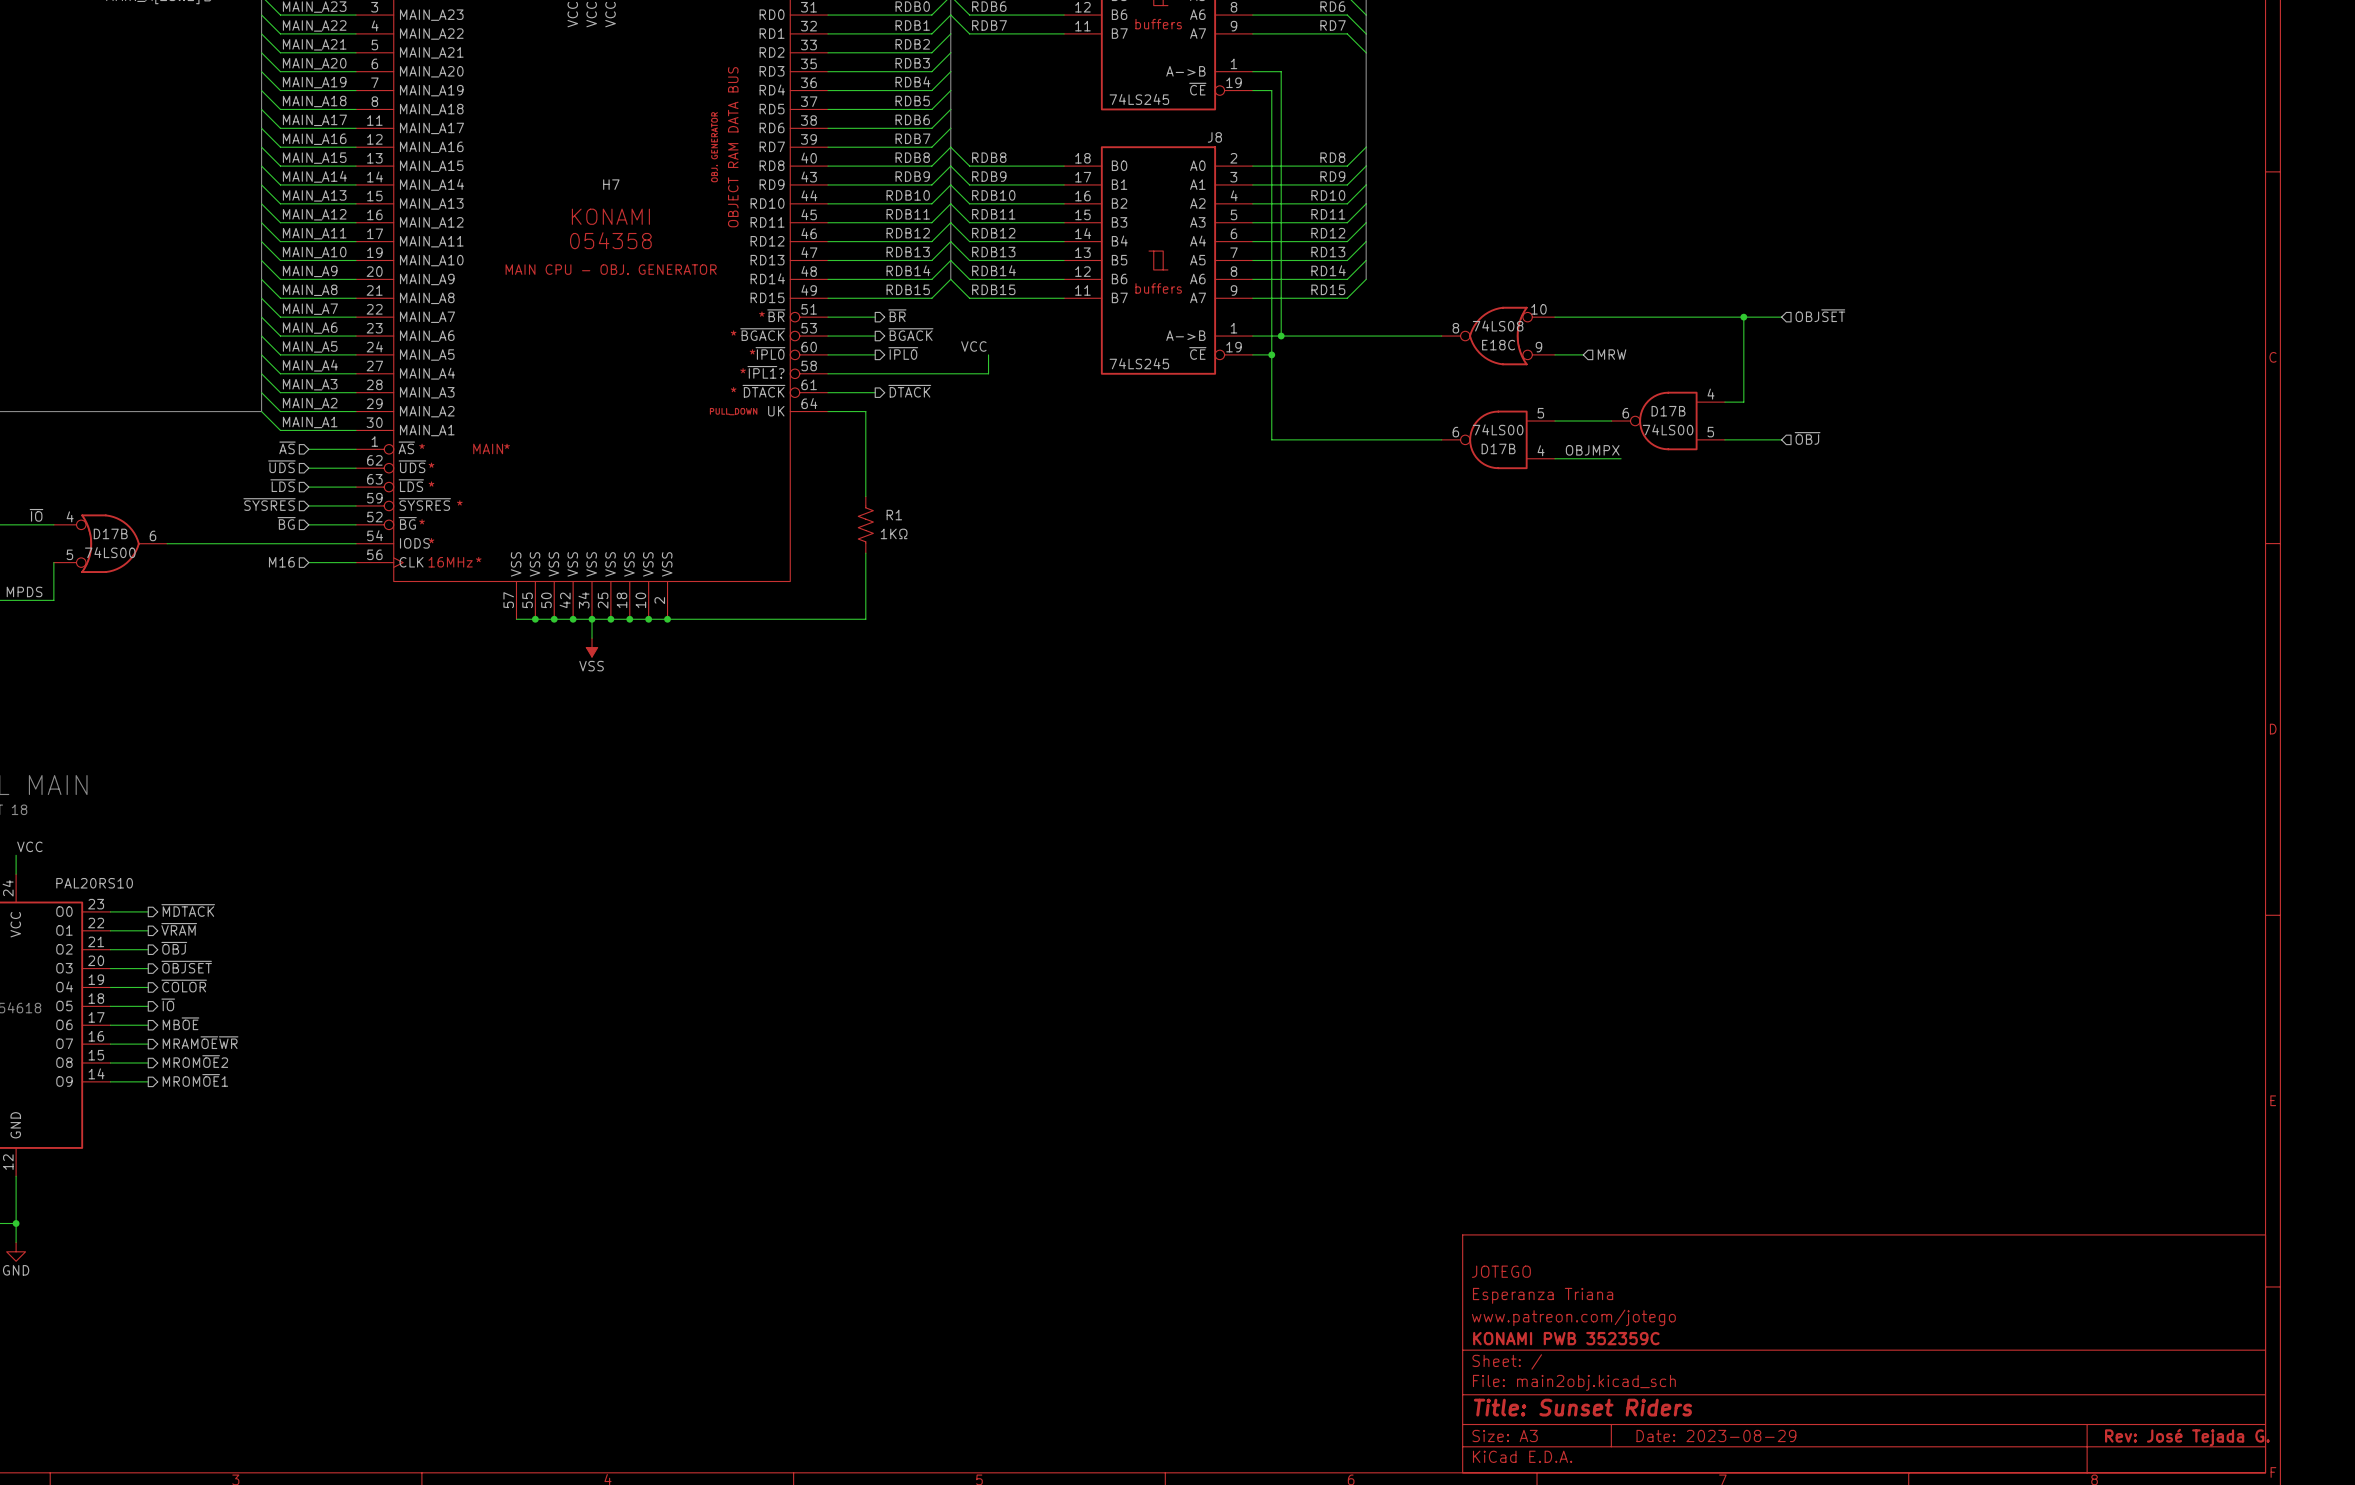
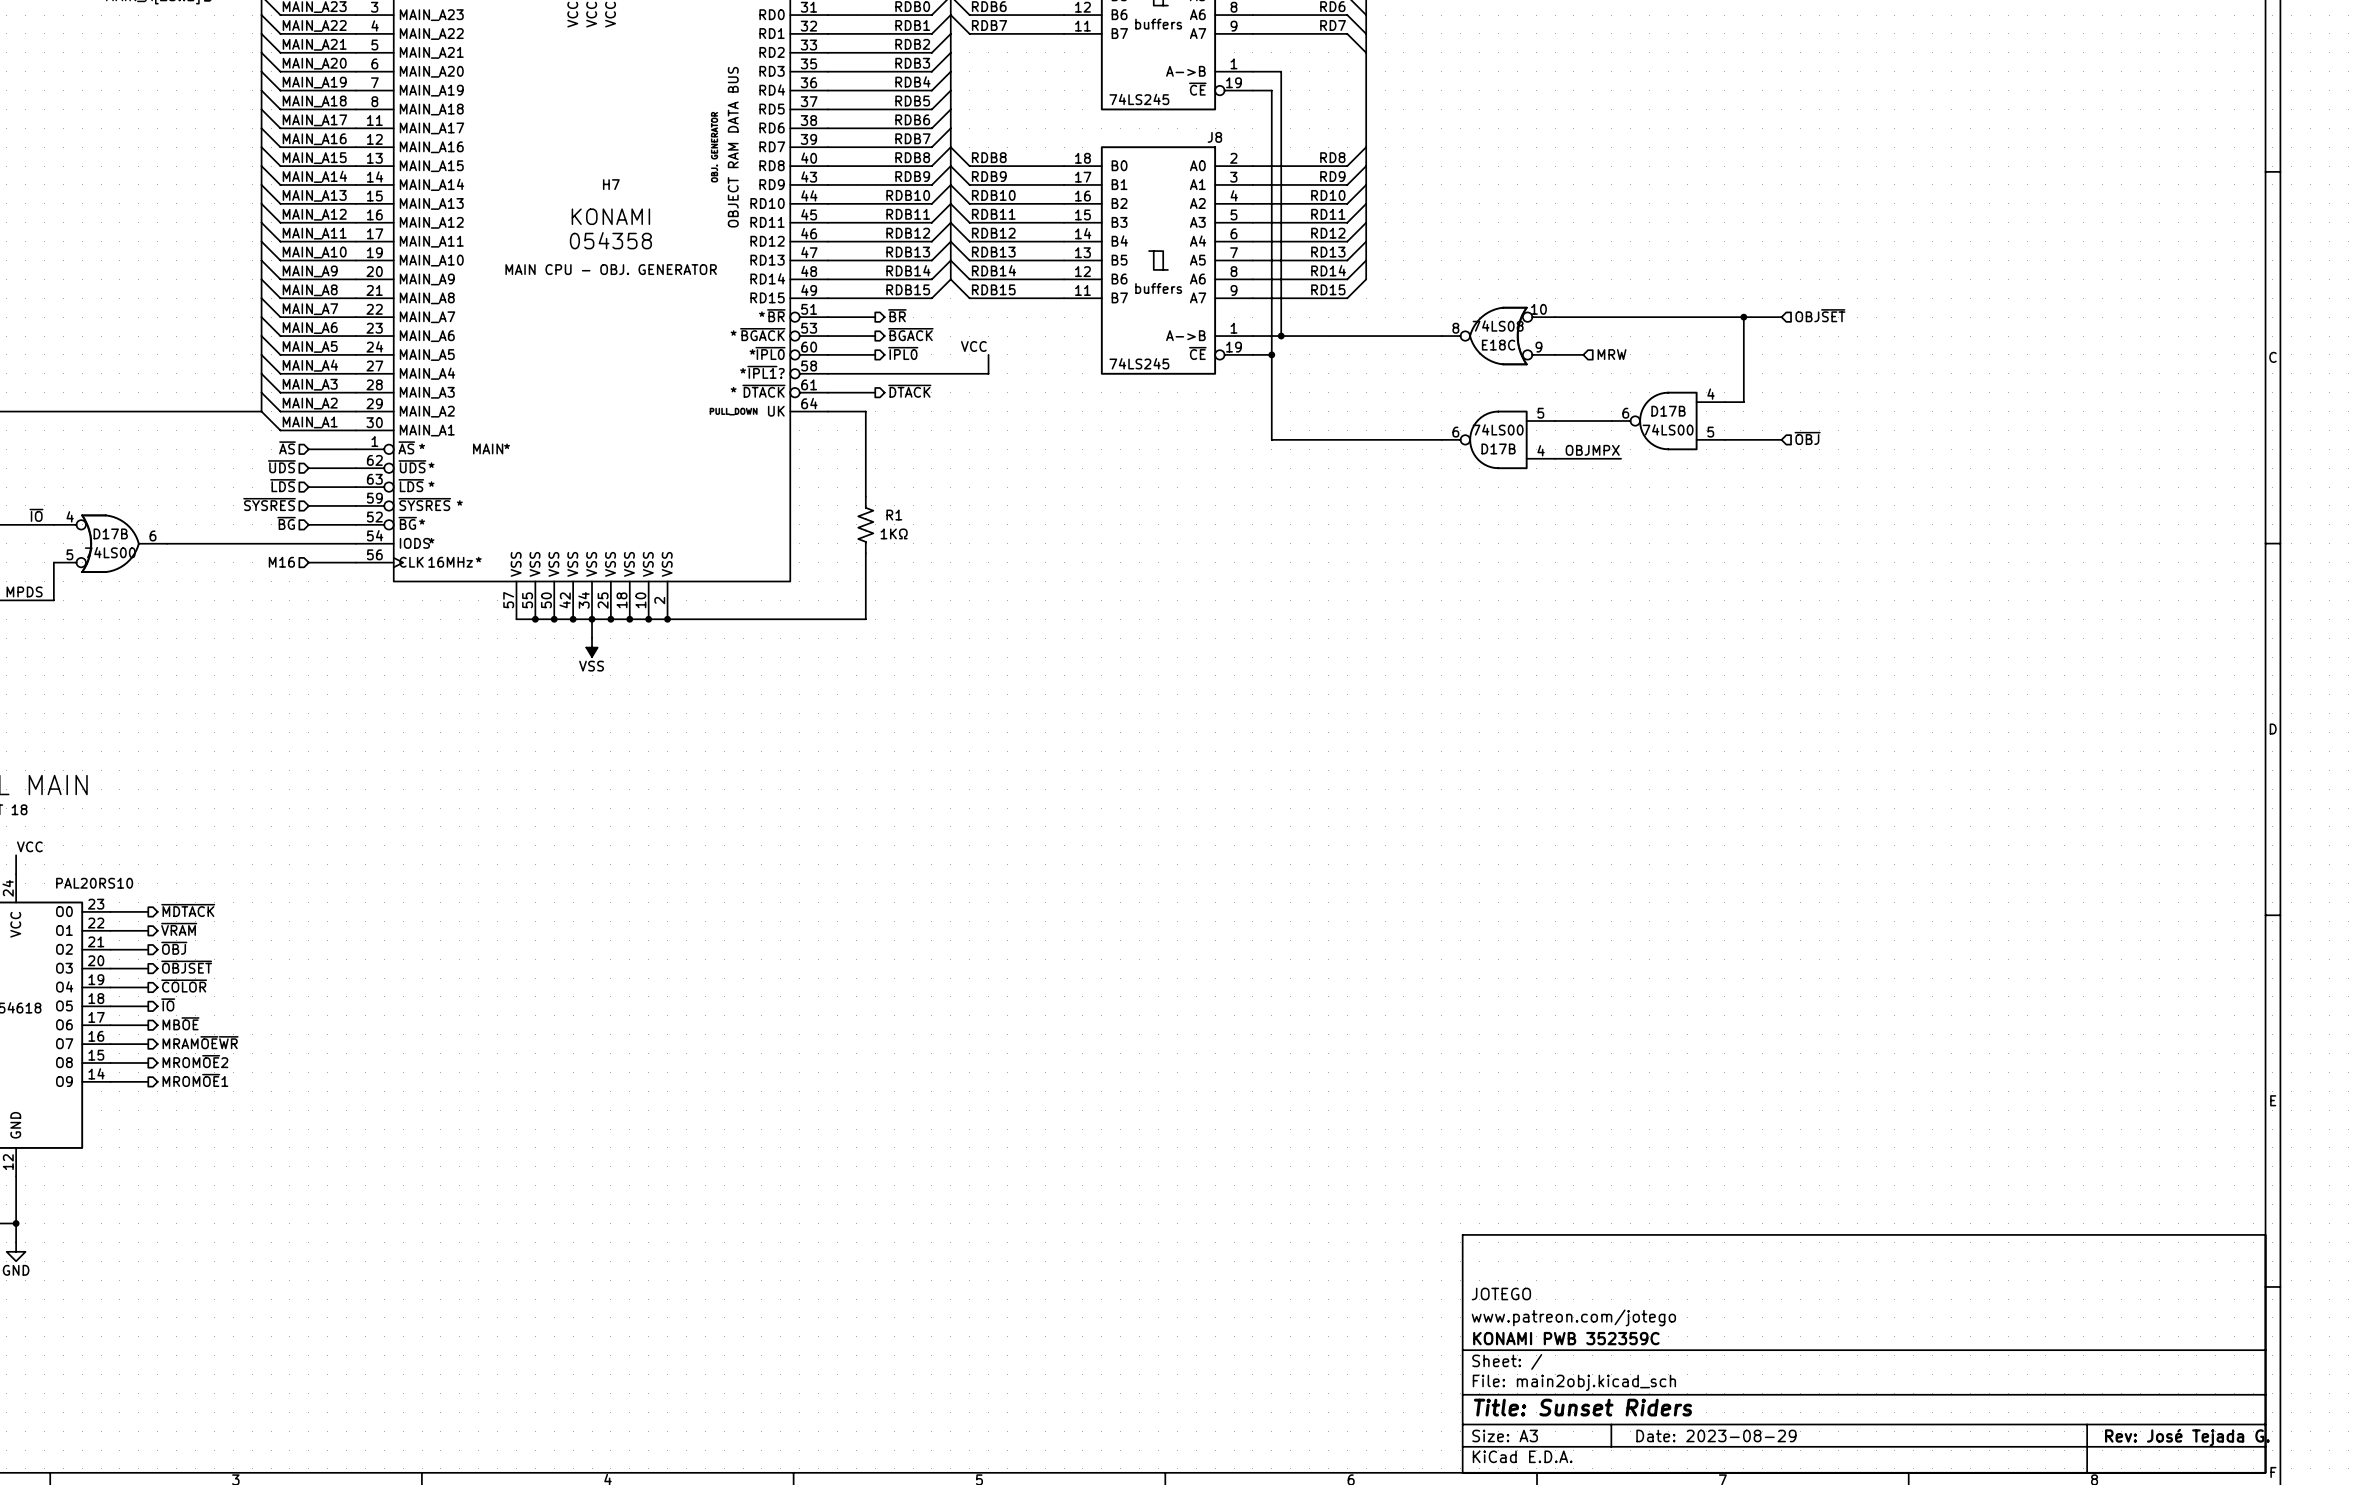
title block: JOTEGO (1501, 1271) -> none
title block: Esperanza Triana (1543, 1295) -> JOTEGO (1501, 1293)

